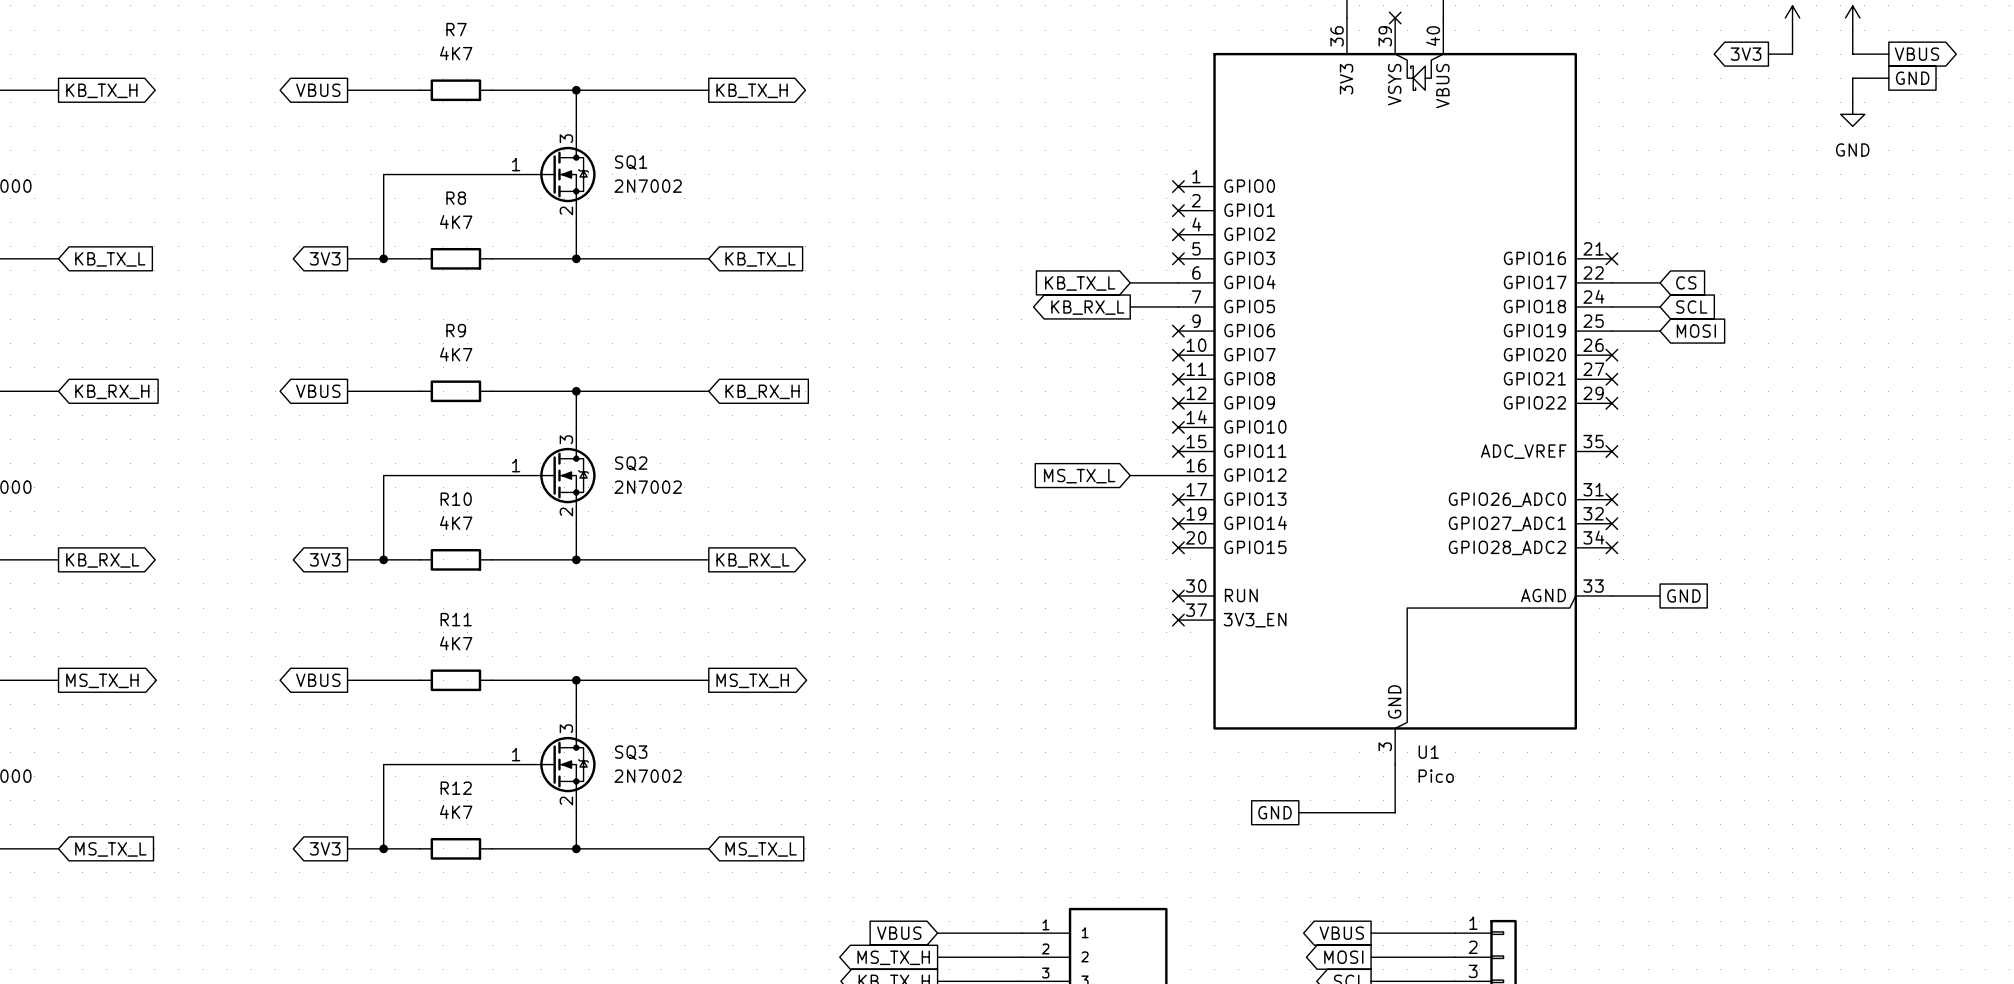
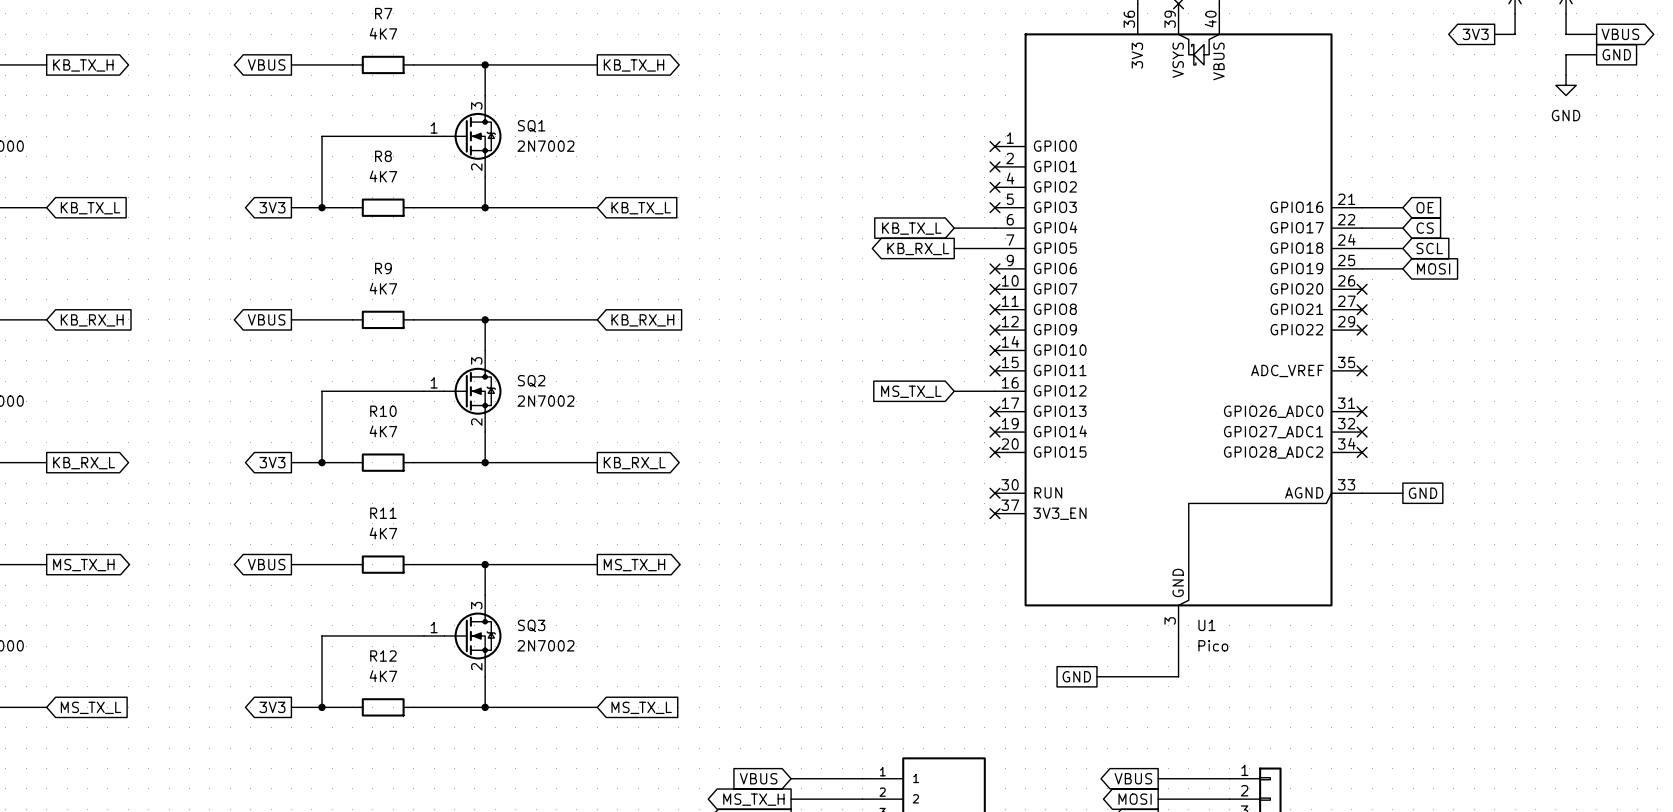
wire: none -> (1362, 207) (1402, 207)
no-connect mark: (1611, 258) -> none
global label: none -> OE (1425, 207)

